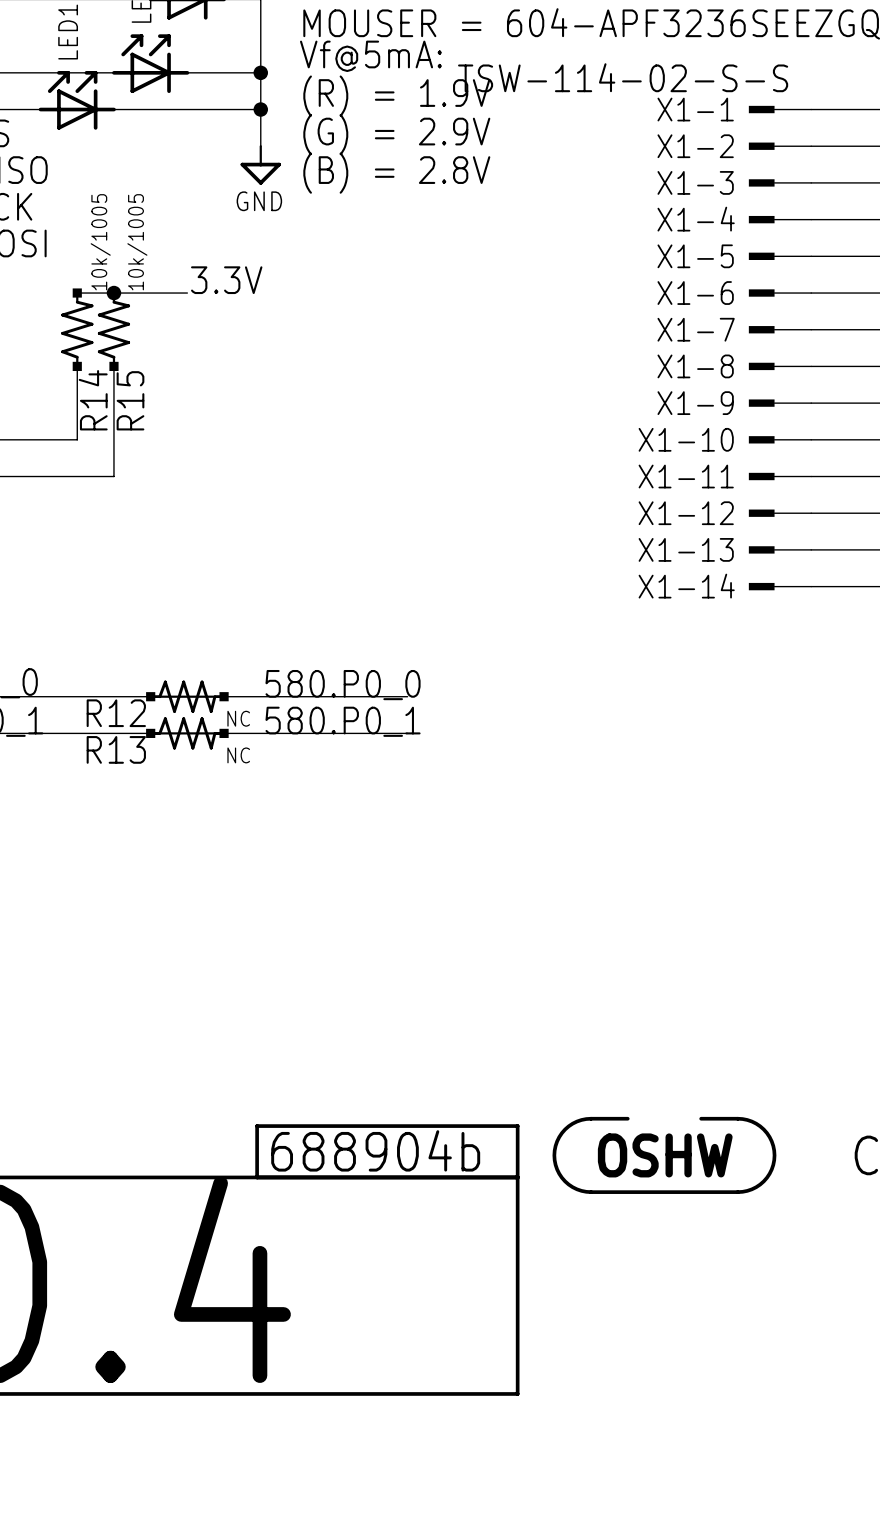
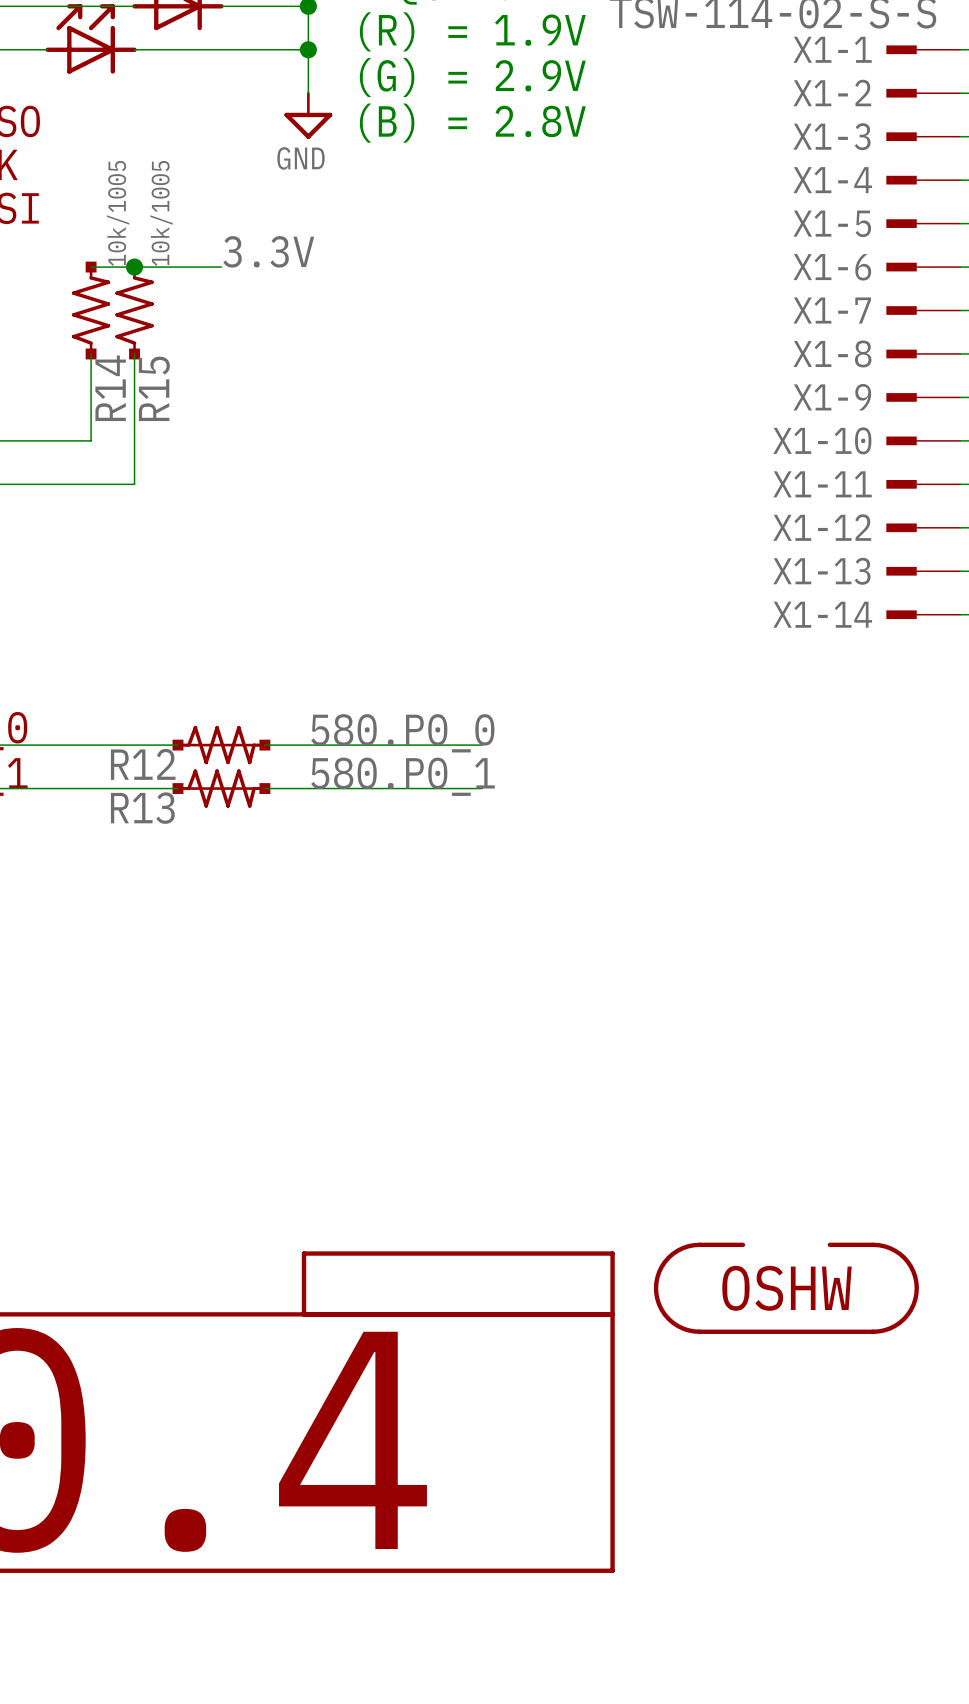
R12 value: NC (238, 718) -> none
R13 value: NC (238, 755) -> none
part value: 688904b (375, 1150) -> none

